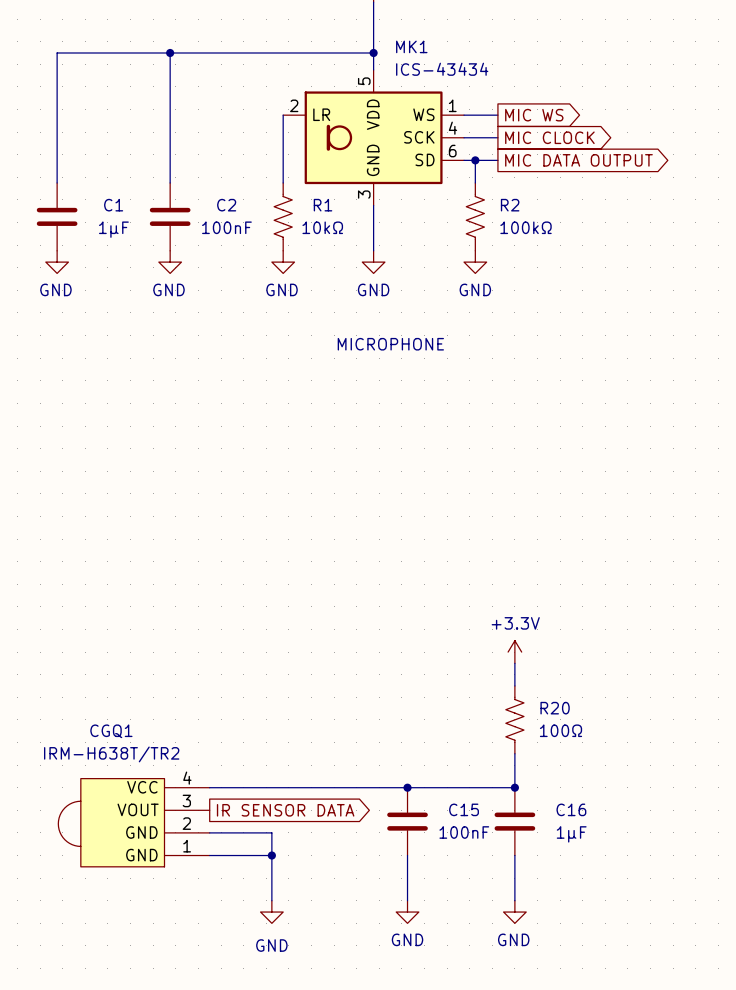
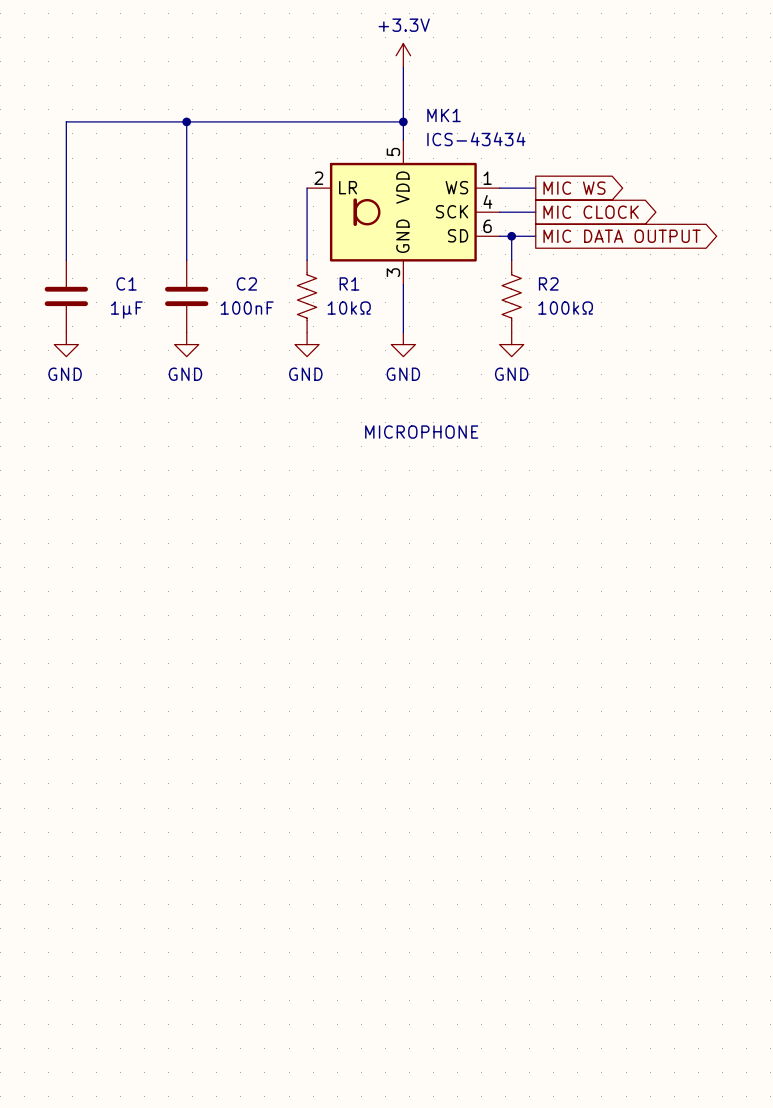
power symbol: +3.3V (514, 652) -> none
wire: (514, 663) (514, 685) -> none
R20: 100Ω (514, 719) -> none
wire: (514, 753) (514, 787) (209, 787) -> none
junction: (407, 787) -> none
junction: (514, 787) -> none
global label: IR SENSOR DATA (285, 810) -> none
C15: 100nF (407, 821) -> none
C16: 1µF (514, 821) -> none
CGQ1: IRM-H638T/TR2 (134, 822) -> none
wire: (209, 832) (271, 832) (271, 900) -> none
wire: (209, 855) (271, 855) -> none
junction: (271, 855) -> none
wire: (407, 855) (407, 900) -> none
wire: (514, 855) (514, 900) -> none
power symbol: GND (271, 912) -> none
power symbol: GND (407, 912) -> none
power symbol: GND (514, 912) -> none

